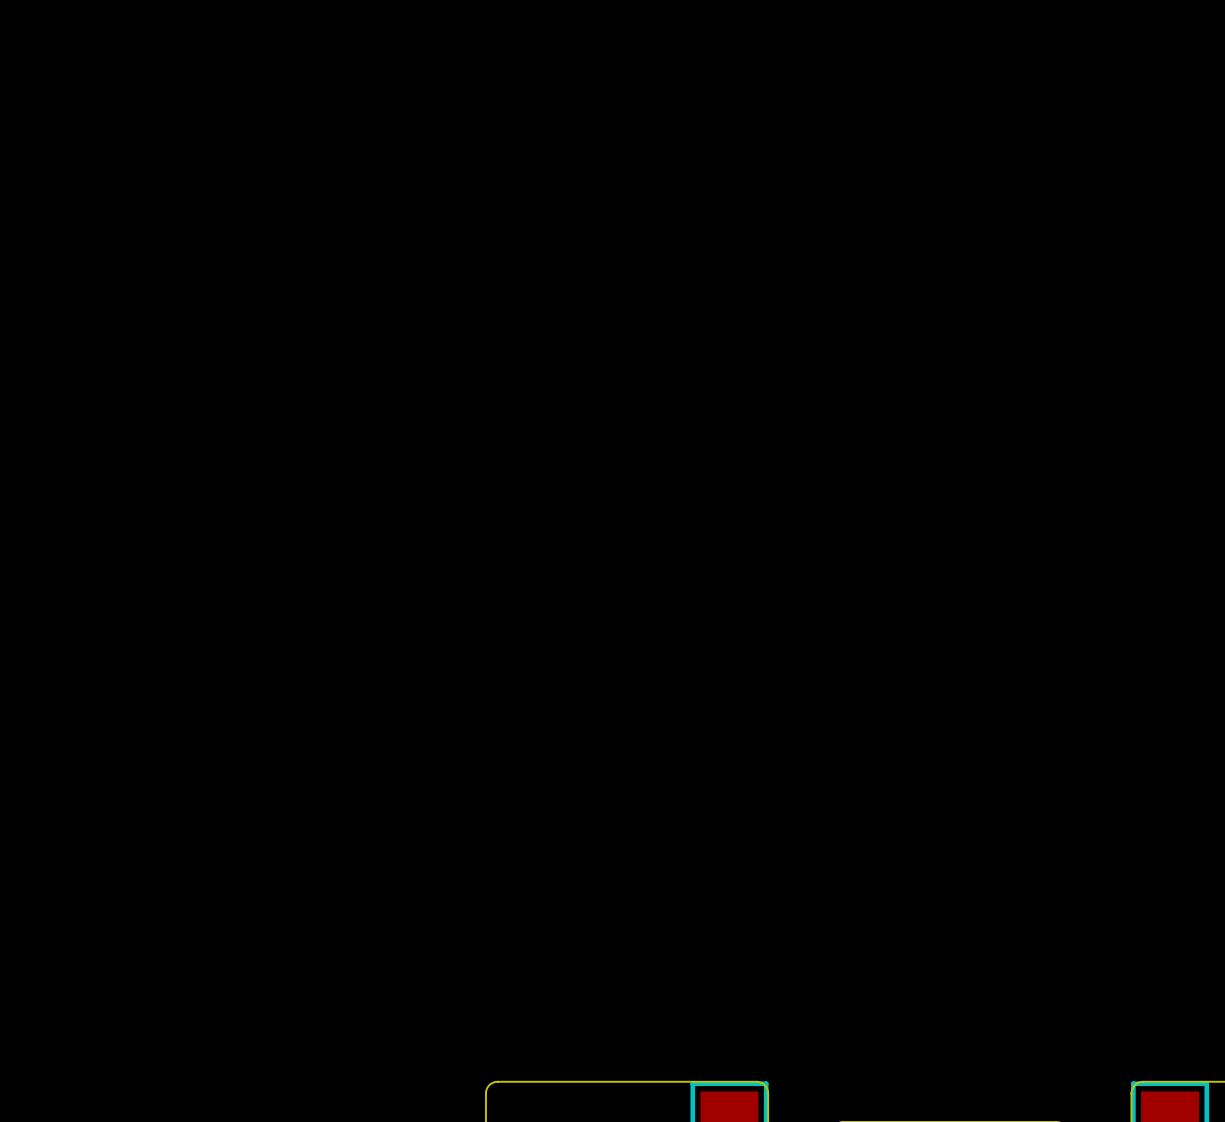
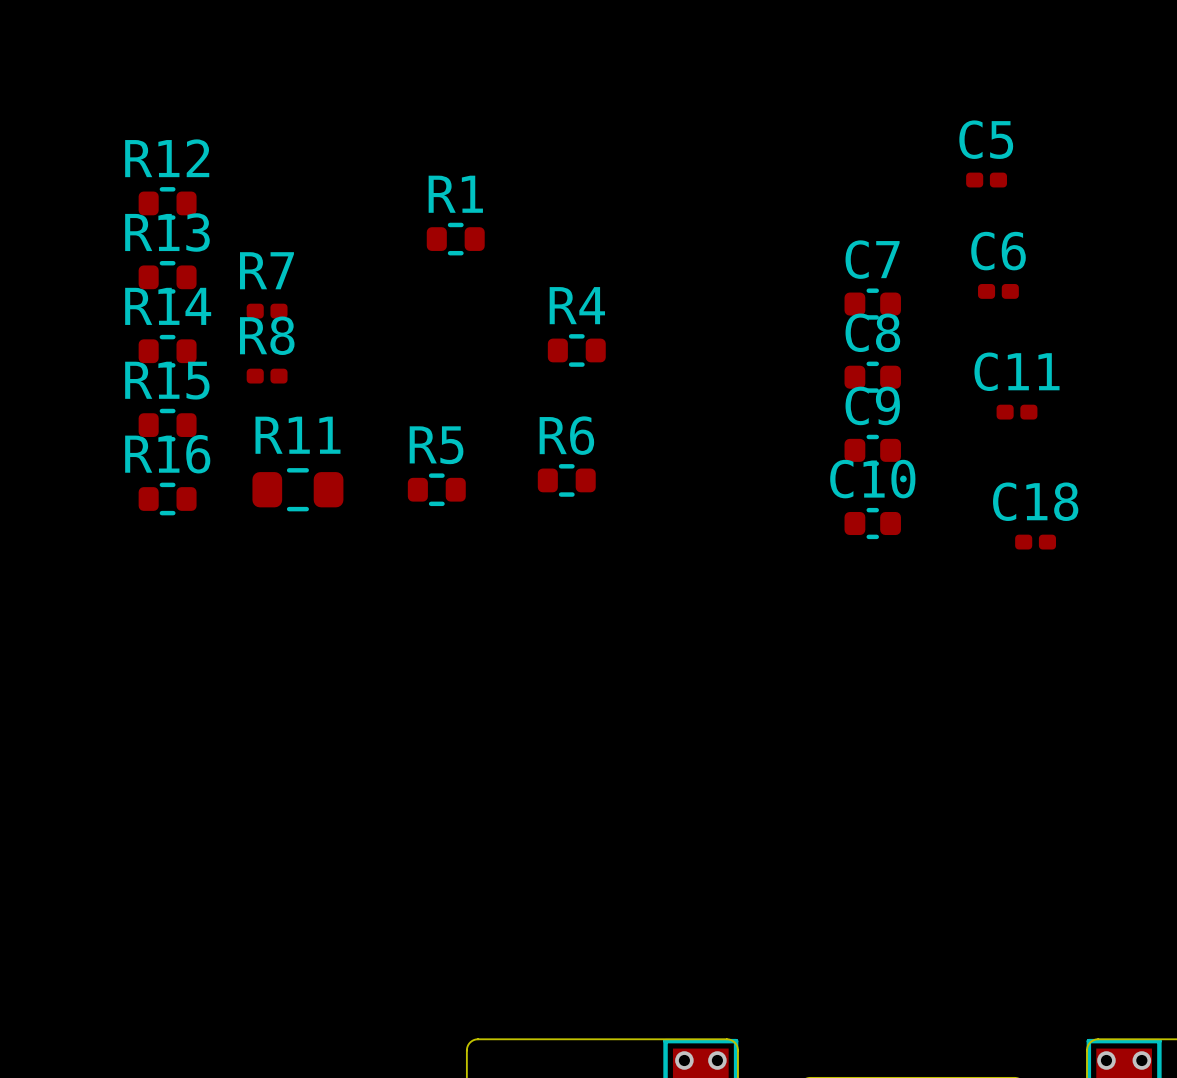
C5: none -> (986, 180)
R12: none -> (167, 203)
R1: none -> (455, 239)
R13: none -> (167, 277)
C6: none -> (998, 291)
C7: none -> (872, 304)
R7: none -> (267, 311)
R4: none -> (576, 350)
R14: none -> (167, 351)
R8: none -> (267, 376)
C8: none -> (872, 377)
C11: none -> (1017, 412)
R15: none -> (167, 425)
C9: none -> (872, 450)
R6: none -> (566, 480)
R11: none -> (297, 489)
R5: none -> (436, 489)
R16: none -> (167, 499)
C10: none -> (872, 523)
C18: none -> (1035, 542)
via: none -> (684, 1060)
via: none -> (717, 1060)
via: none -> (1106, 1060)
via: none -> (1141, 1060)

